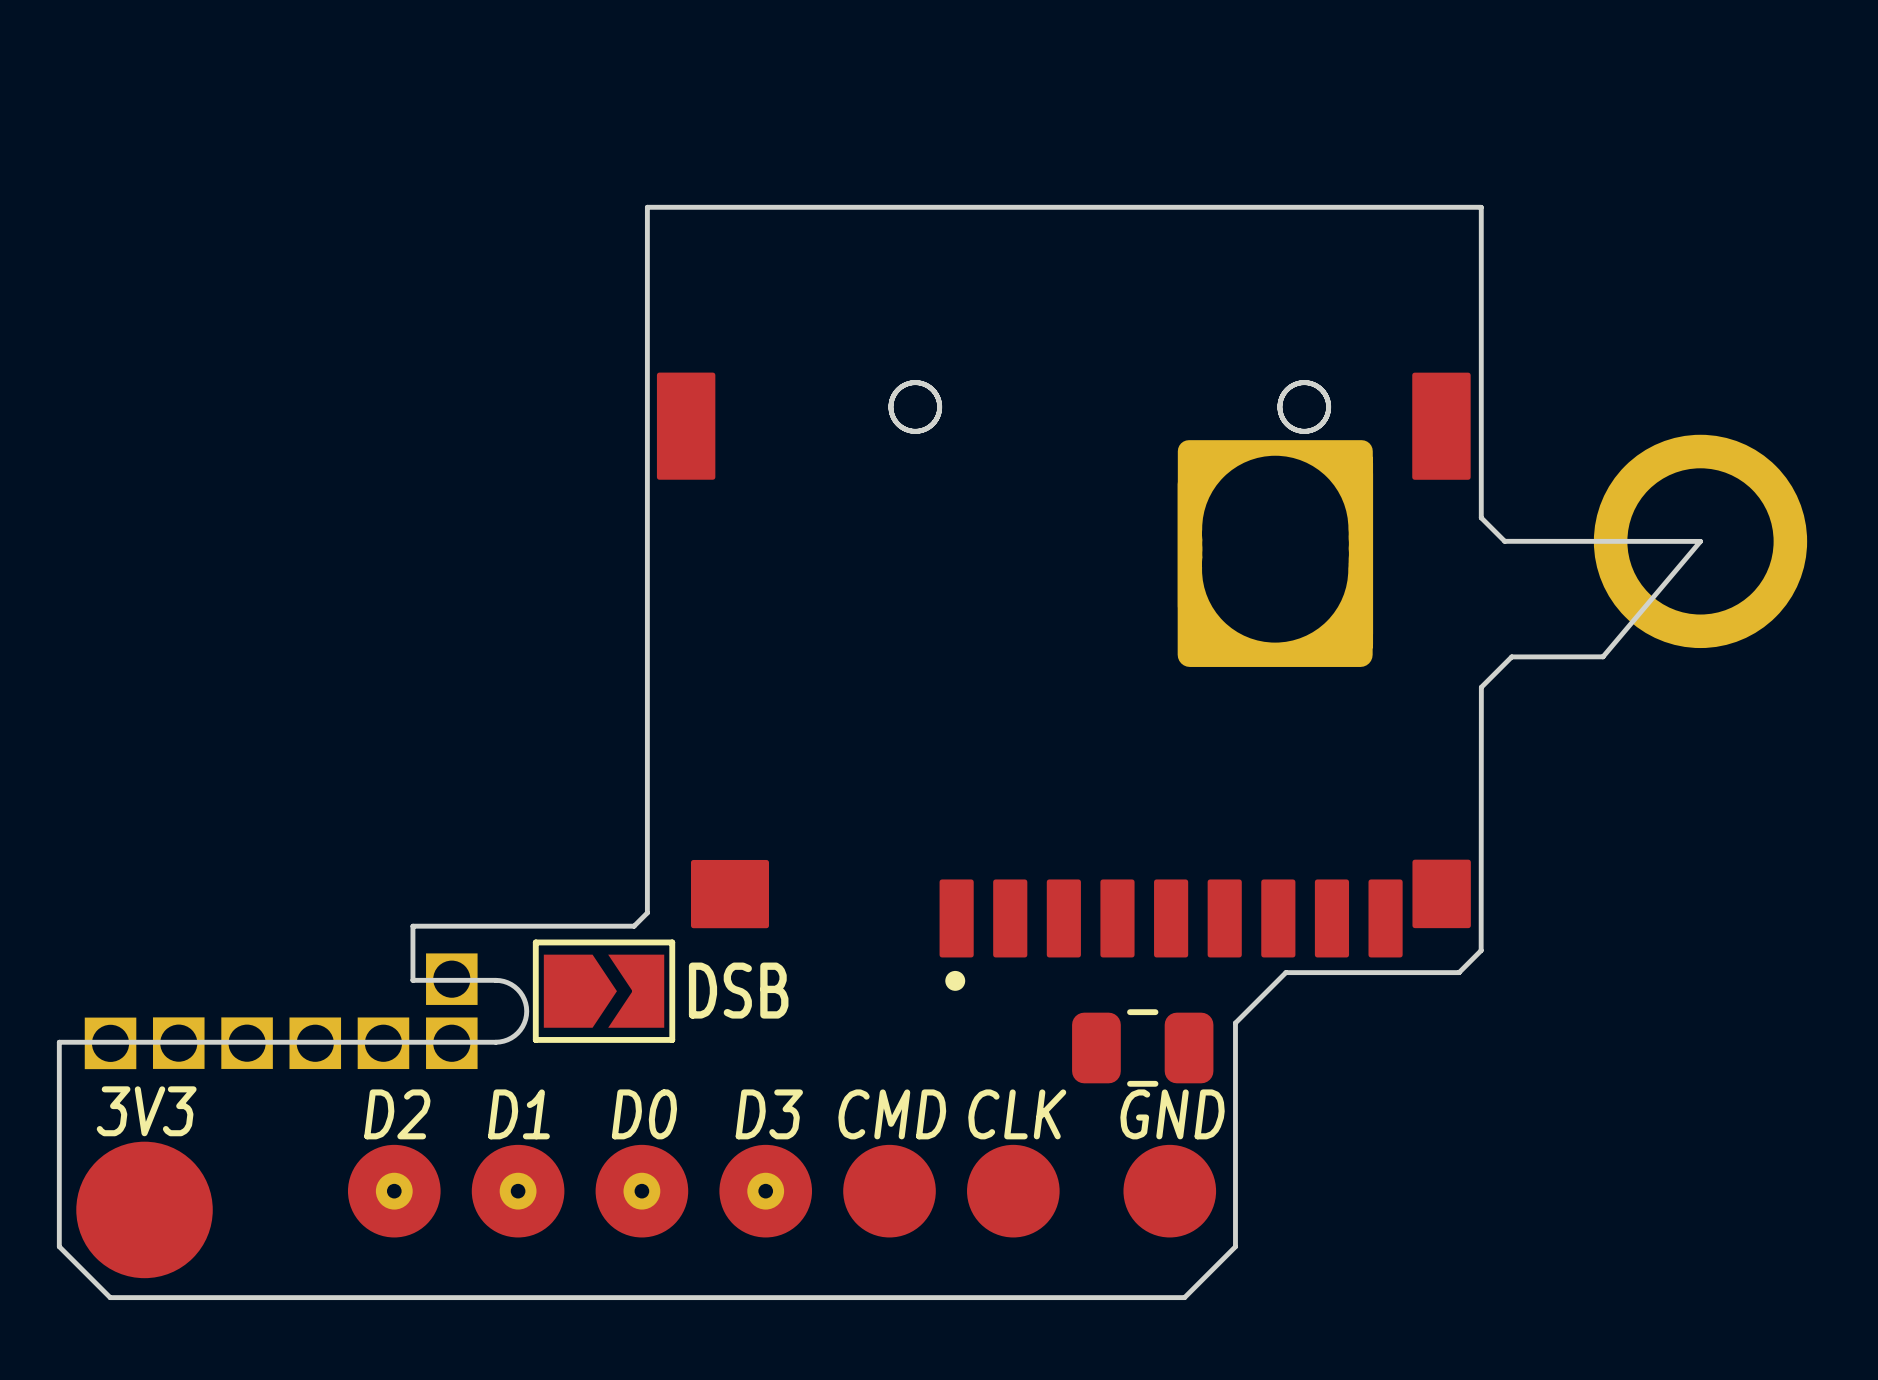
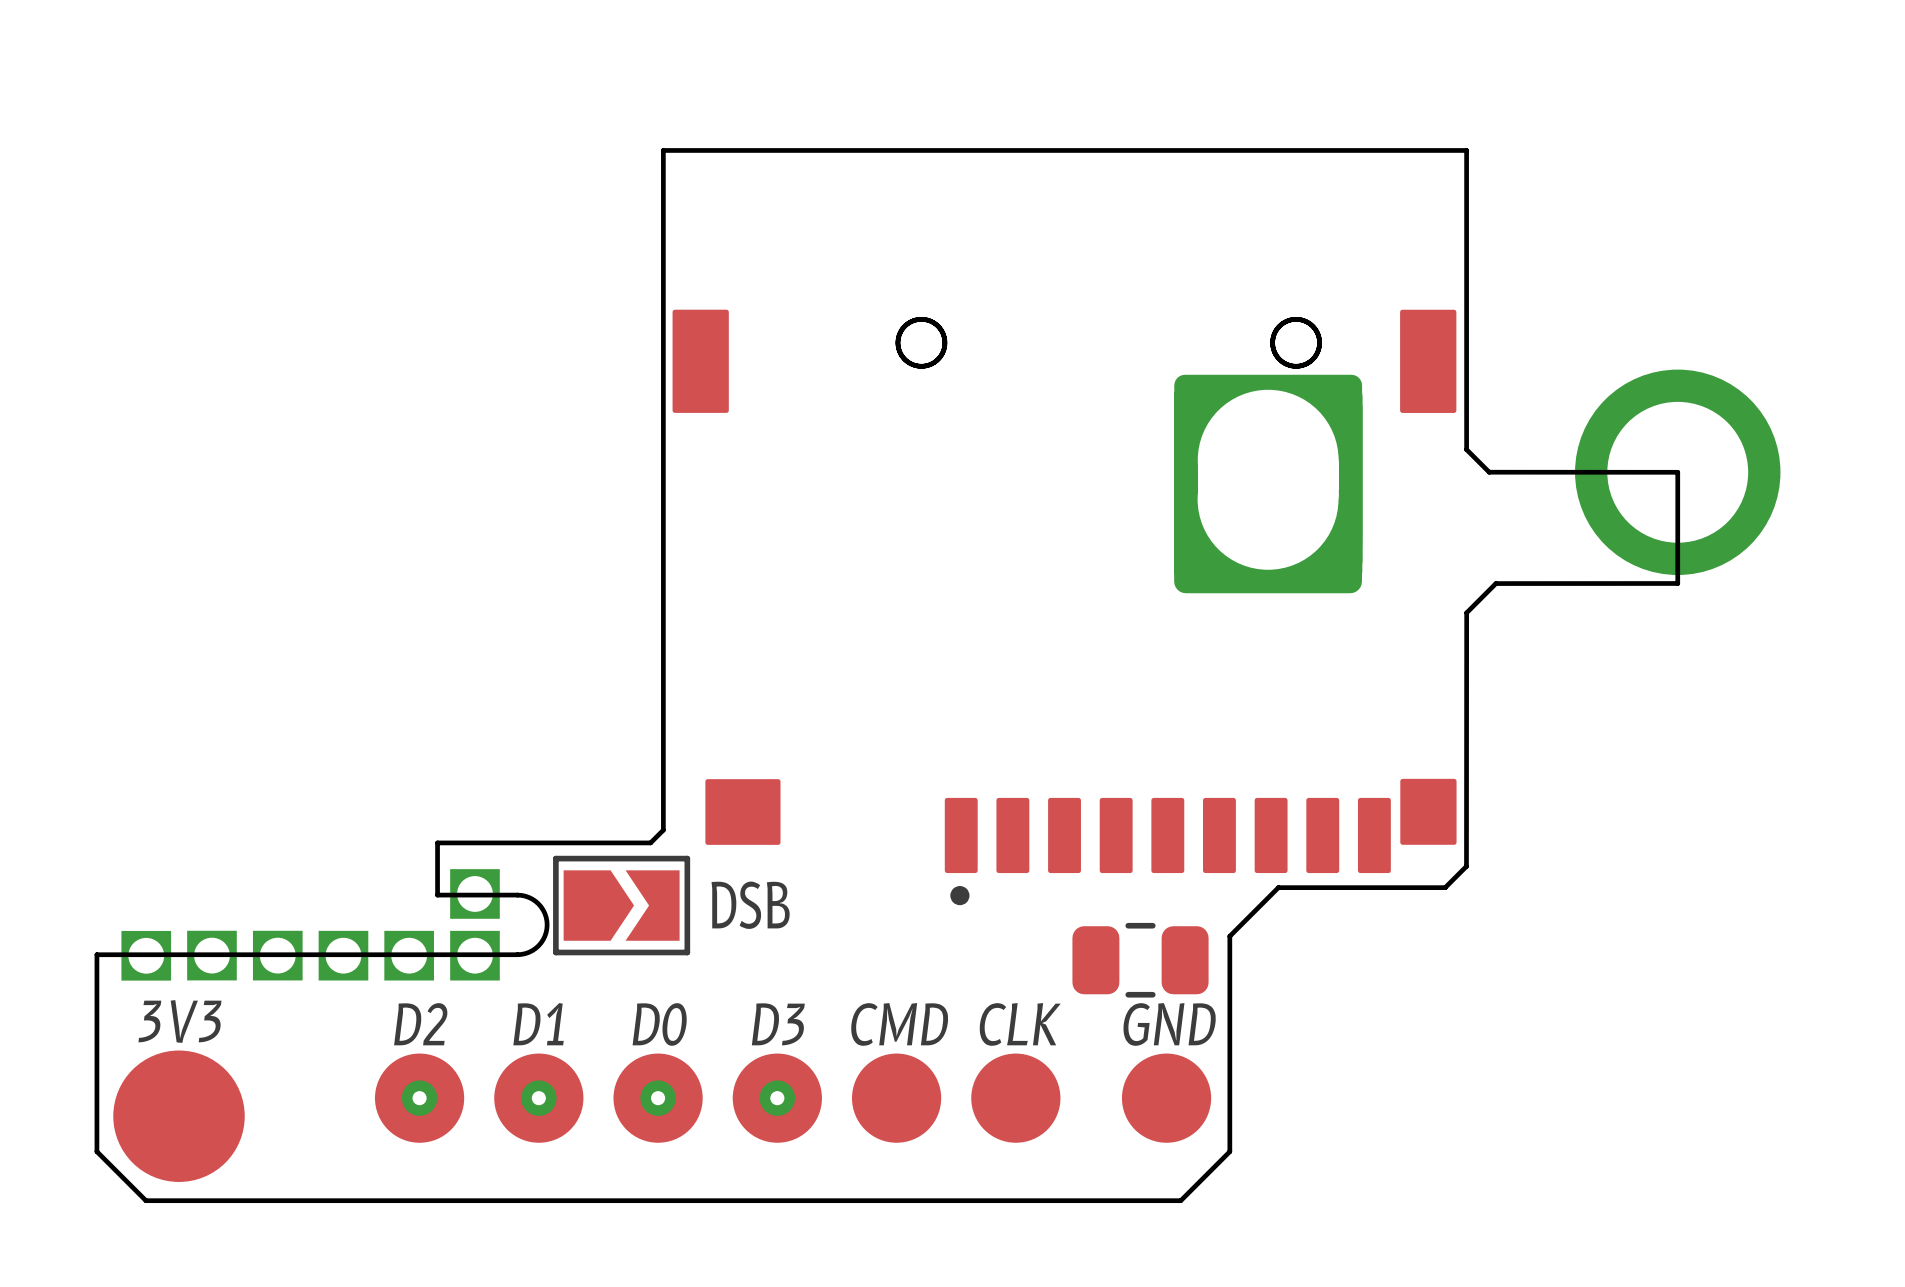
board edge: (1700, 541) (1603, 656) (1511, 656) -> (1677, 472) (1677, 583) (1495, 583)

